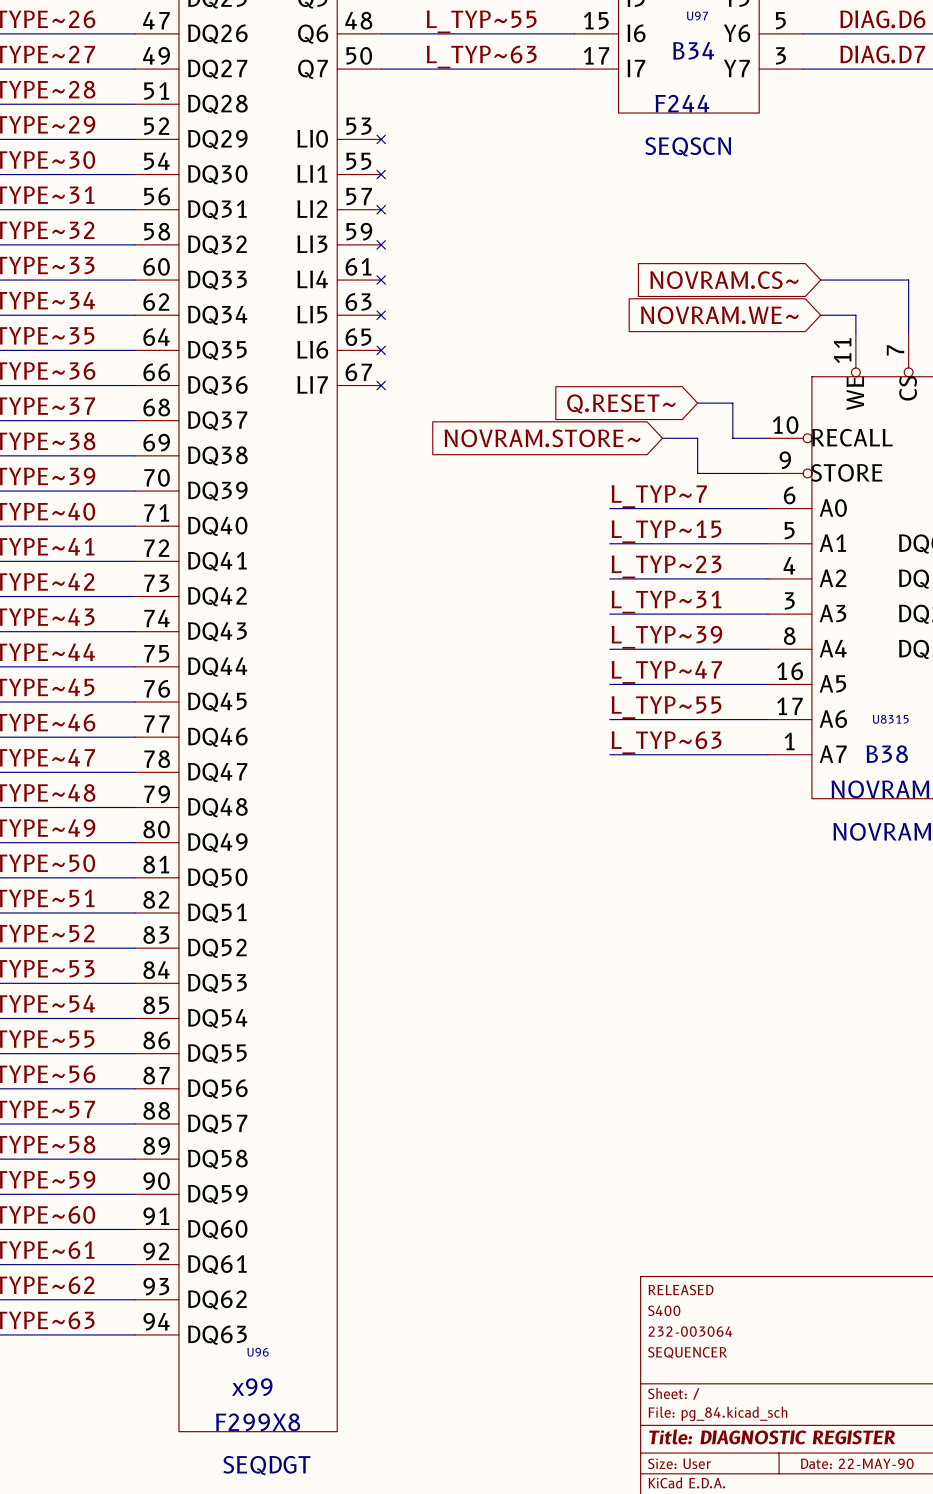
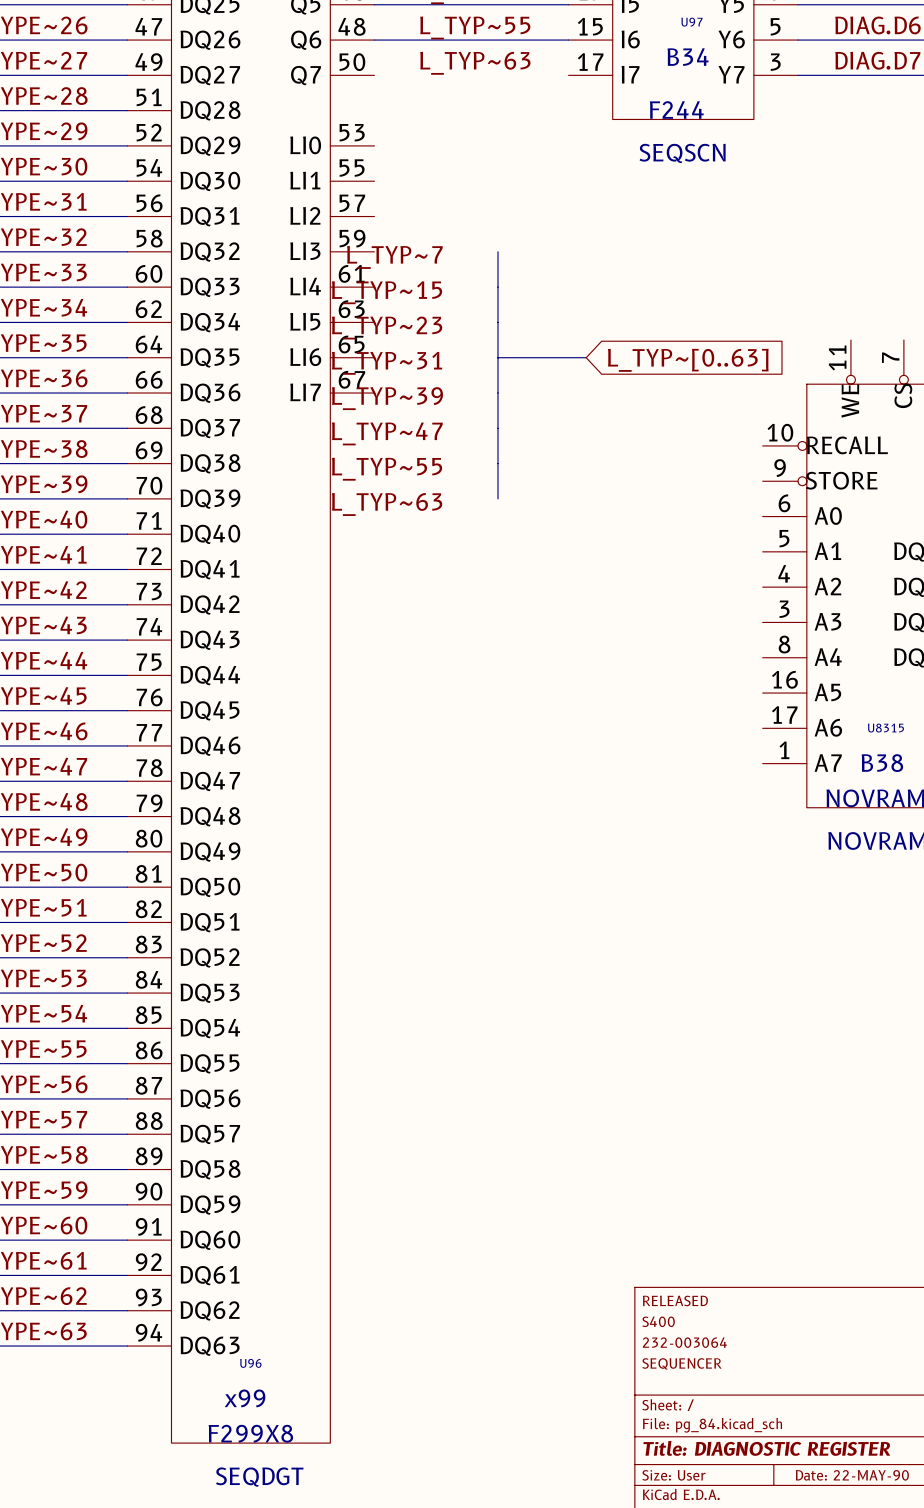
wire: (381, 69) (574, 69) -> none
no-connect mark: (381, 139) -> none
no-connect mark: (381, 174) -> none
no-connect mark: (381, 209) -> none
no-connect mark: (381, 244) -> none
bus: none -> (497, 251) (497, 498)
label: none -> L_TYP~7 (394, 257)
no-connect mark: (381, 280) -> none
global label: NOVRAM.CS~ (724, 280) -> none
wire: (820, 280) (908, 280) (908, 332) -> none
label: none -> L_TYP~15 (387, 292)
no-connect mark: (381, 315) -> none
global label: NOVRAM.WE~ (719, 315) -> none
wire: (820, 315) (855, 315) (855, 332) -> none
label: none -> L_TYP~23 (387, 328)
no-connect mark: (381, 350) -> none
bus: none -> (497, 357) (586, 357)
global label: none -> L_TYP~[0..63] (688, 360)
label: none -> L_TYP~31 (387, 363)
no-connect mark: (381, 385) -> none
label: none -> L_TYP~39 (387, 398)
global label: Q.RESET~ (621, 403) -> none
wire: (697, 403) (732, 403) (732, 438) (767, 438) -> none
label: none -> L_TYP~47 (387, 433)
global label: NOVRAM.STORE~ (542, 438) -> none
wire: (662, 438) (697, 438) (697, 473) (767, 473) -> none
label: none -> L_TYP~55 (387, 469)
label: none -> L_TYP~63 (387, 504)
label: L_TYP~7 (659, 496) -> none
wire: (609, 508) (767, 508) -> none
label: L_TYP~15 (666, 531) -> none
wire: (609, 543) (767, 543) -> none
label: L_TYP~23 (666, 566) -> none
wire: (609, 578) (767, 578) -> none
label: L_TYP~31 (666, 602) -> none
wire: (609, 614) (767, 614) -> none
label: L_TYP~39 (666, 637) -> none
wire: (609, 649) (767, 649) -> none
label: L_TYP~47 (666, 672) -> none
wire: (609, 684) (767, 684) -> none
label: L_TYP~55 (666, 707) -> none
wire: (609, 719) (767, 719) -> none
label: L_TYP~63 (666, 742) -> none
wire: (609, 754) (767, 754) -> none

